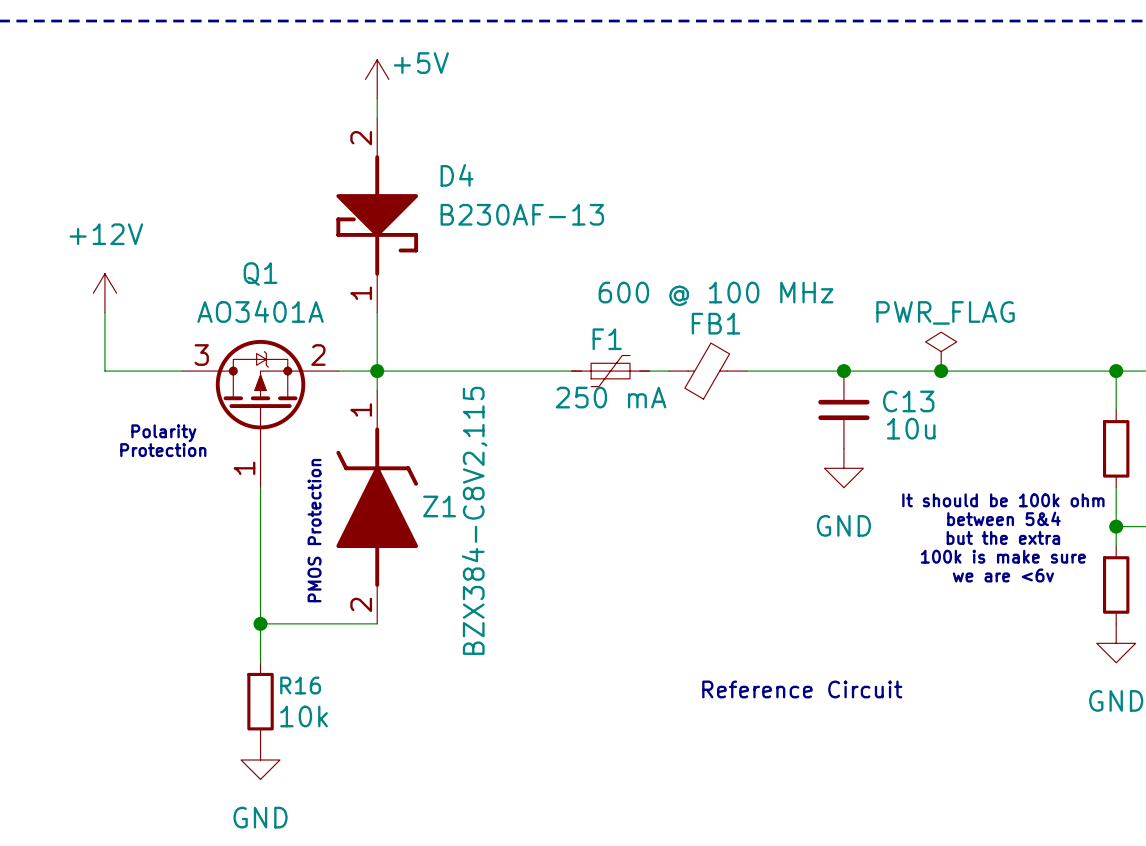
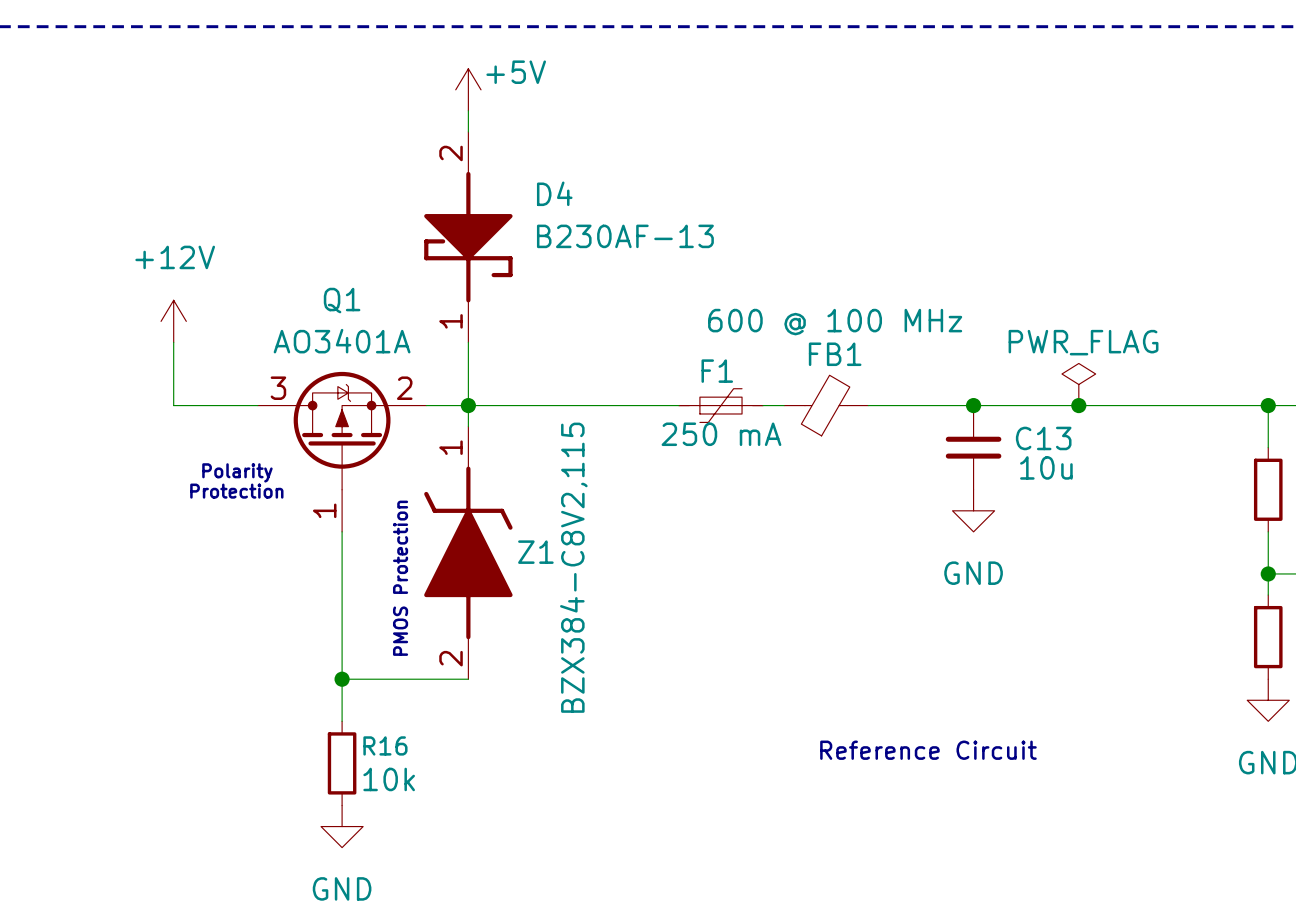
text: It should be 100k ohm (1003, 500) -> none
text: between 5&4 (1003, 518) -> none
text: but the extra (1003, 537) -> none
text: 100k is make sure (1003, 556) -> none
text: we are <6v (1003, 575) -> none

